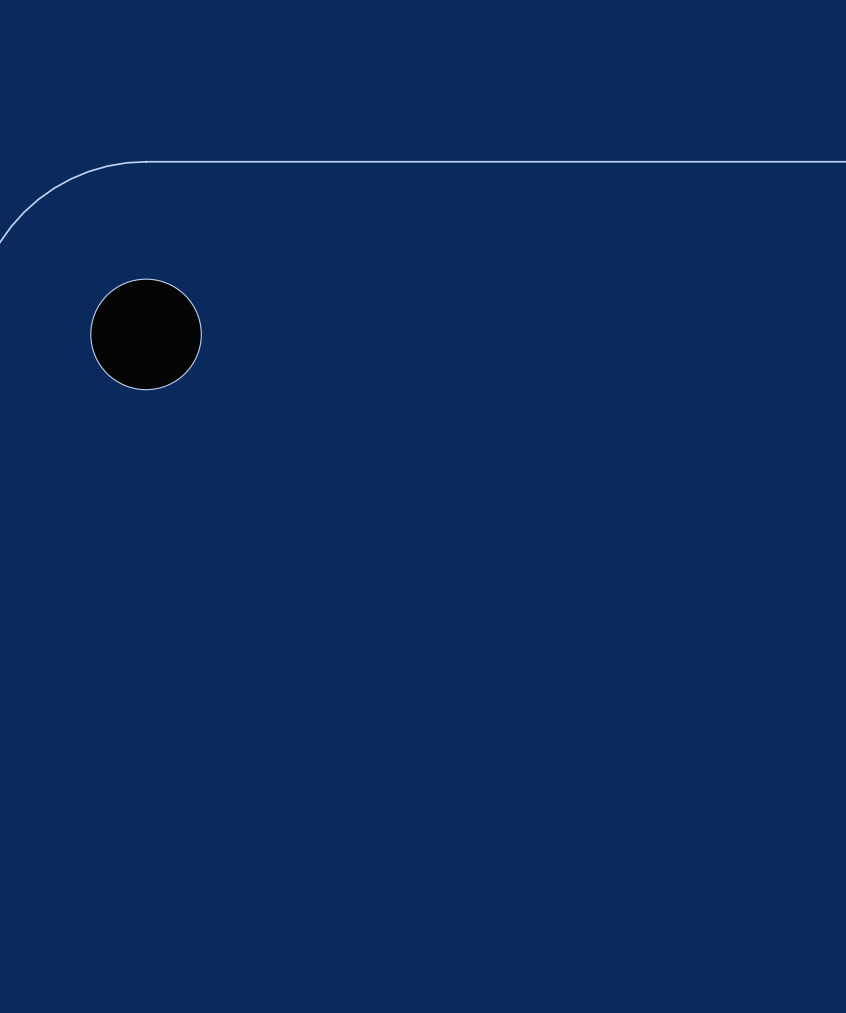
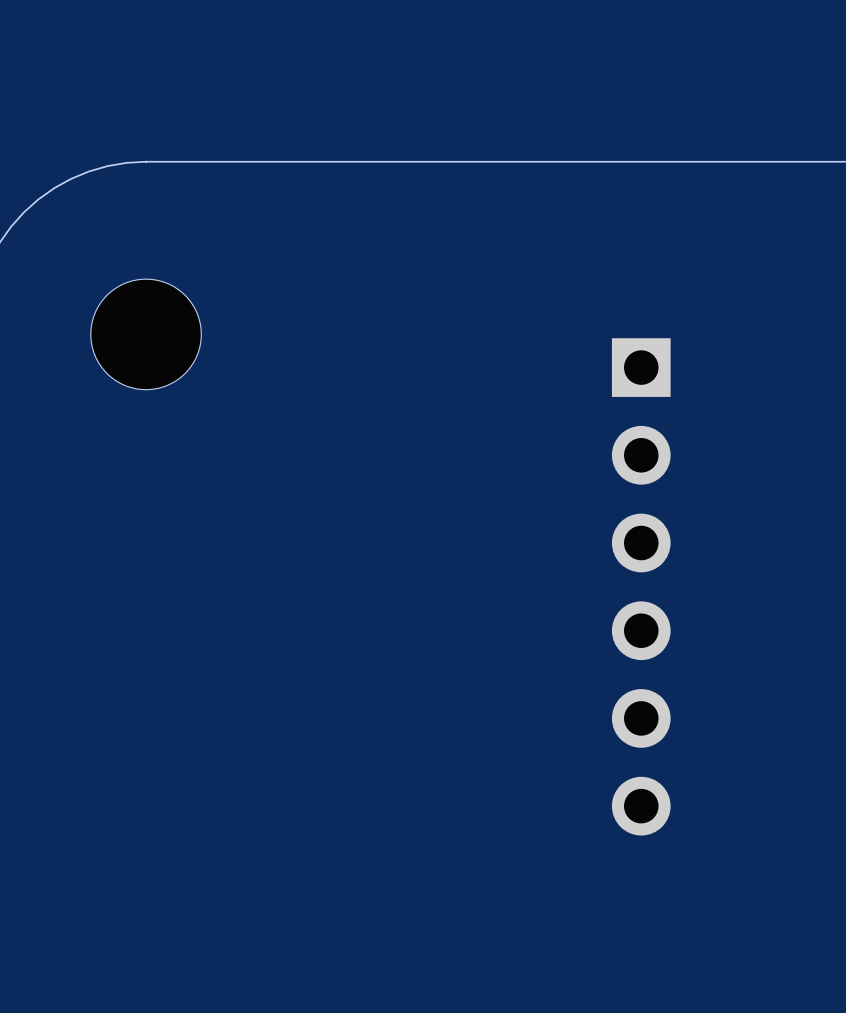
part: none -> (641, 586)

